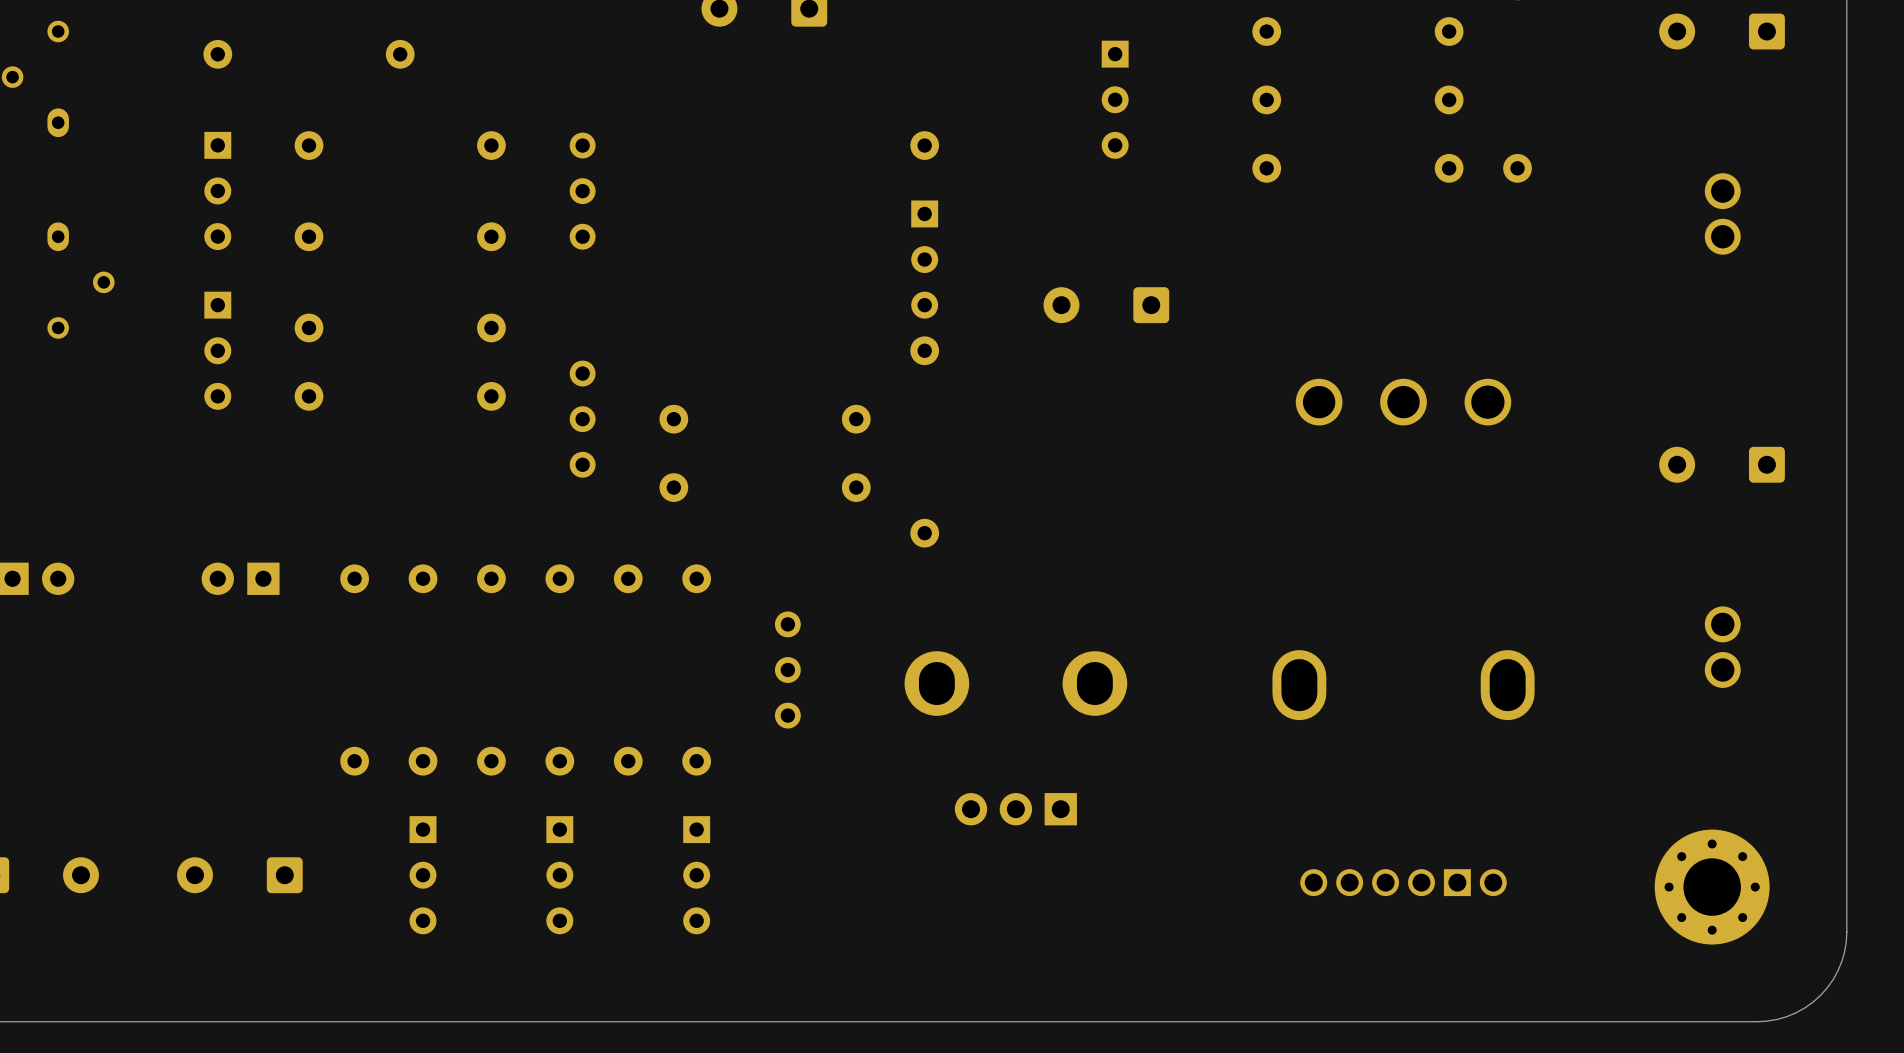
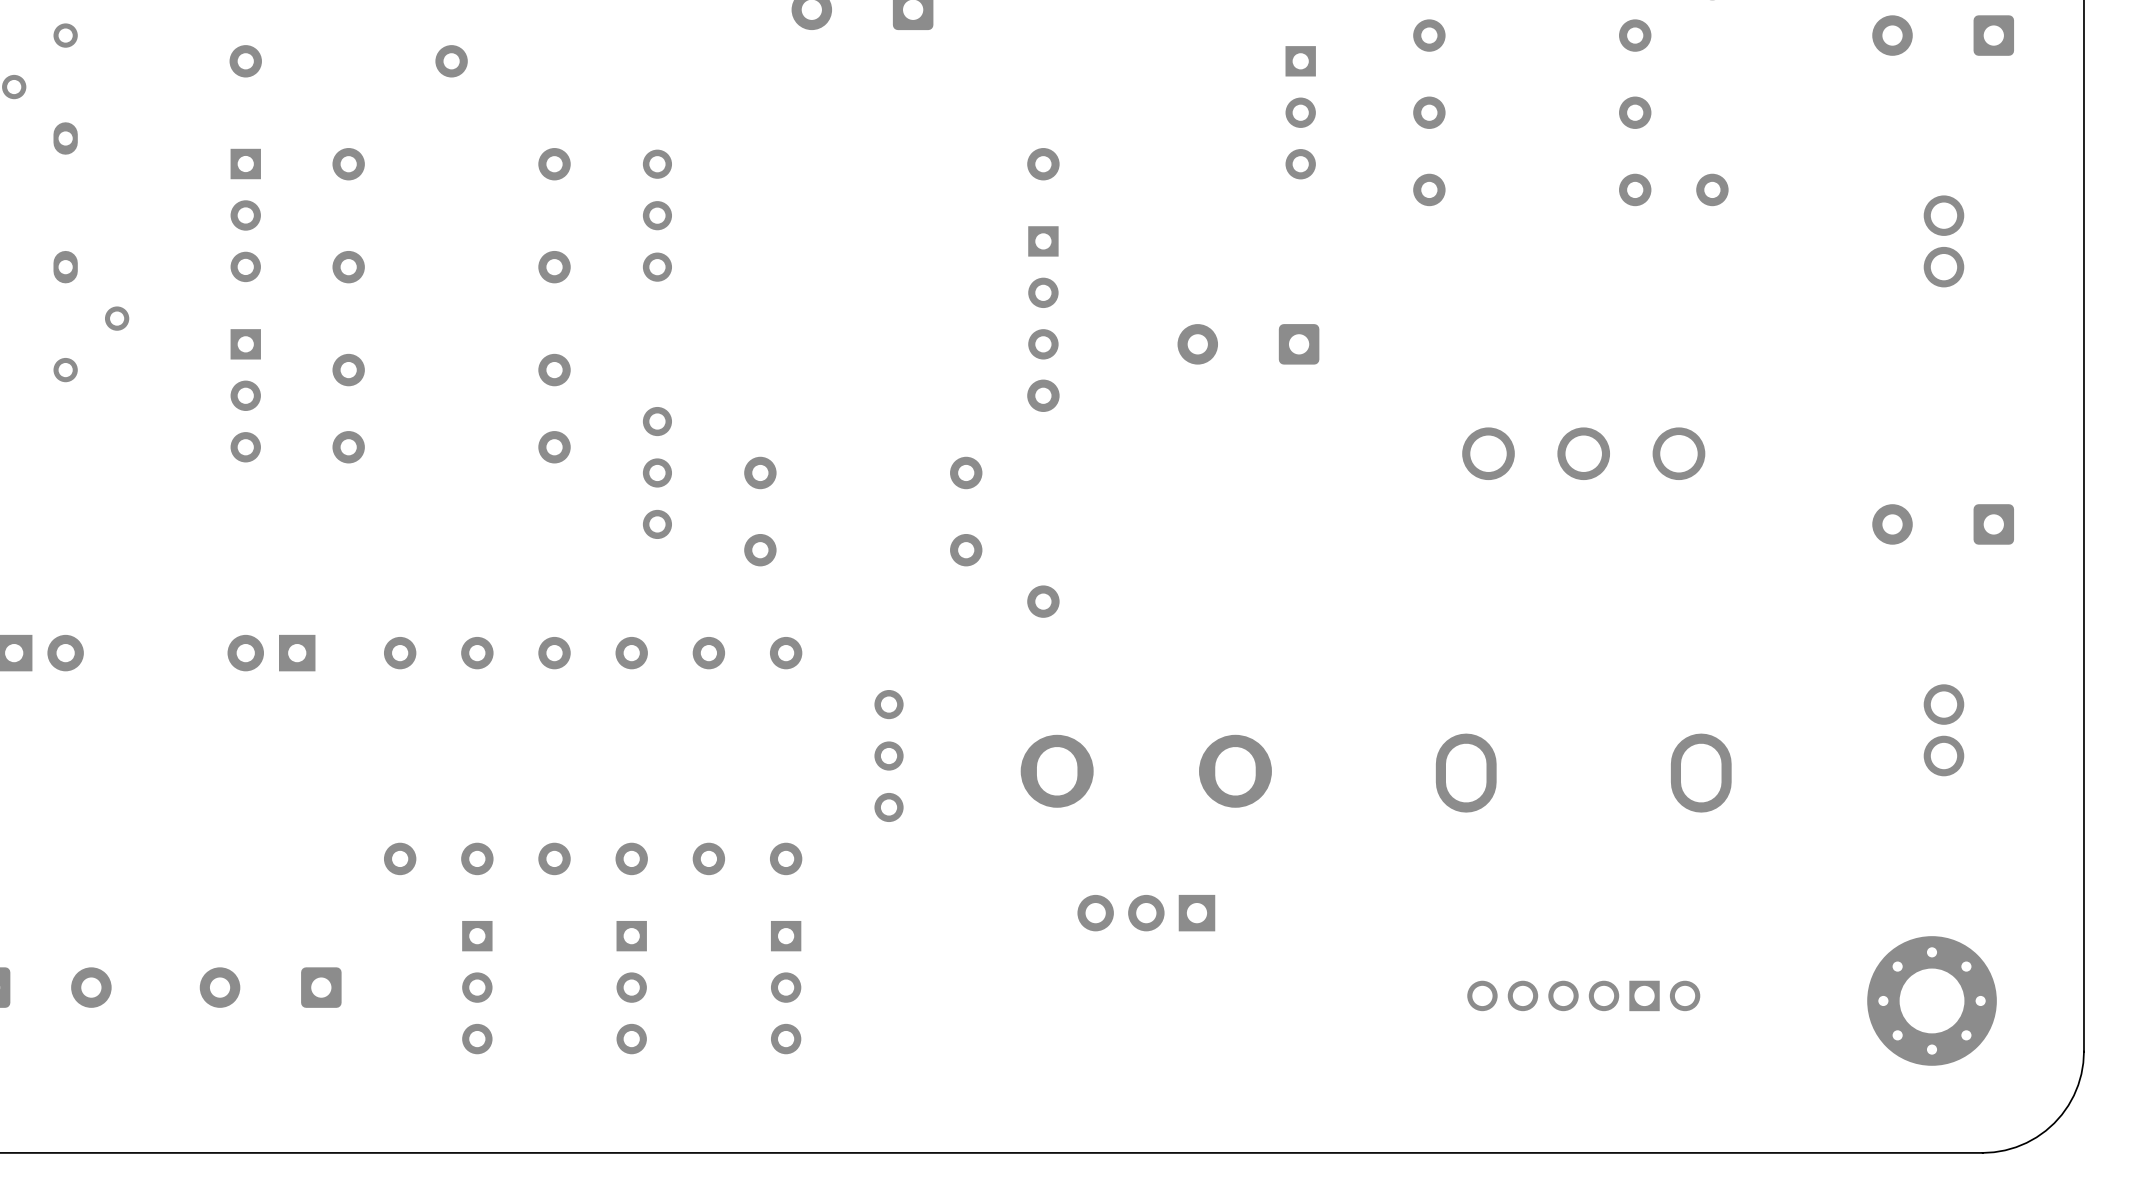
part position: (1115, 99) -> (1300, 112)

